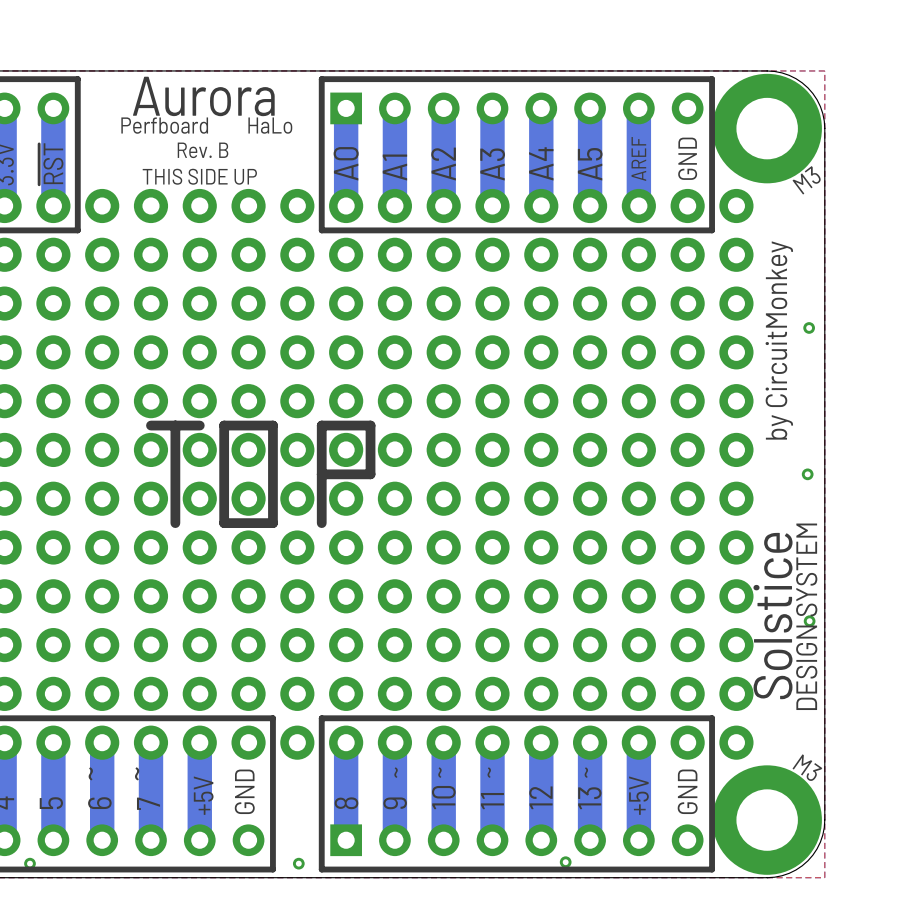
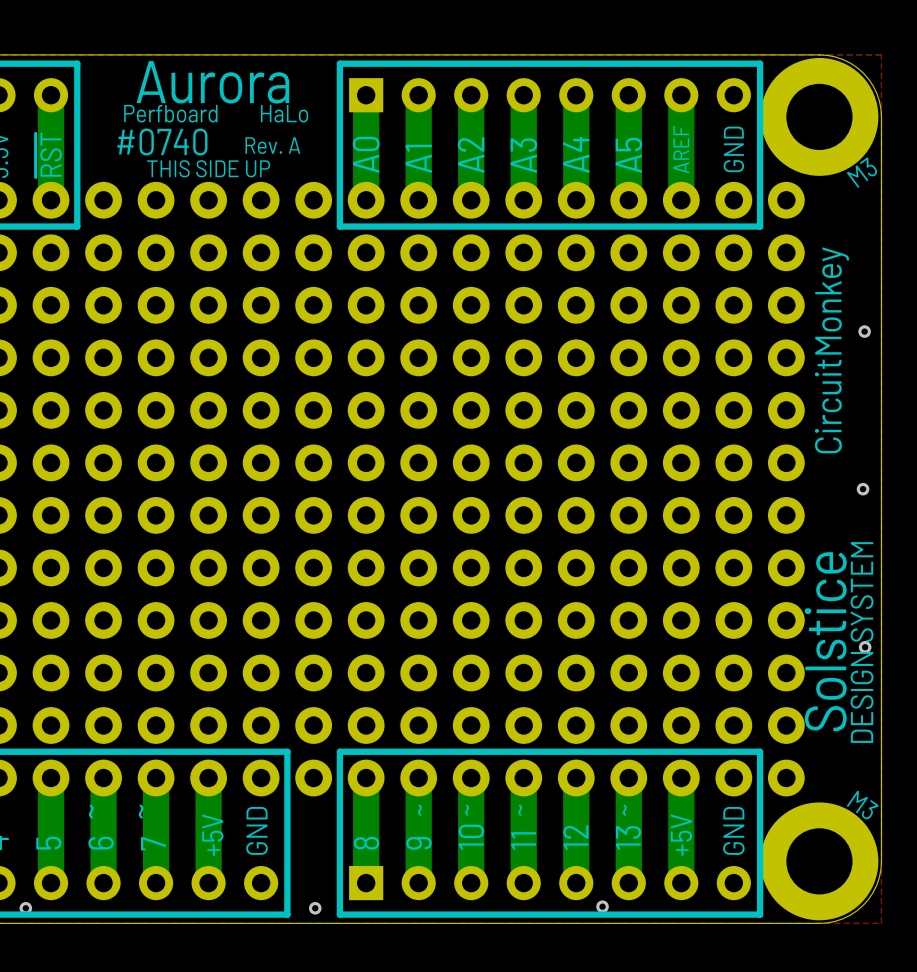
text: Rev. B (203, 150) -> Rev. A (272, 145)
text: none -> #0740 (162, 141)
text: by CircuitMonkey (779, 340) -> CircuitMonkey (831, 350)
line: (150, 425) (199, 425) -> none
line: (175, 425) (175, 523) -> none
line: (224, 425) (272, 425) (272, 523) (224, 523) (224, 425) -> none
line: (321, 474) (370, 474) (370, 425) (321, 425) (321, 523) -> none

